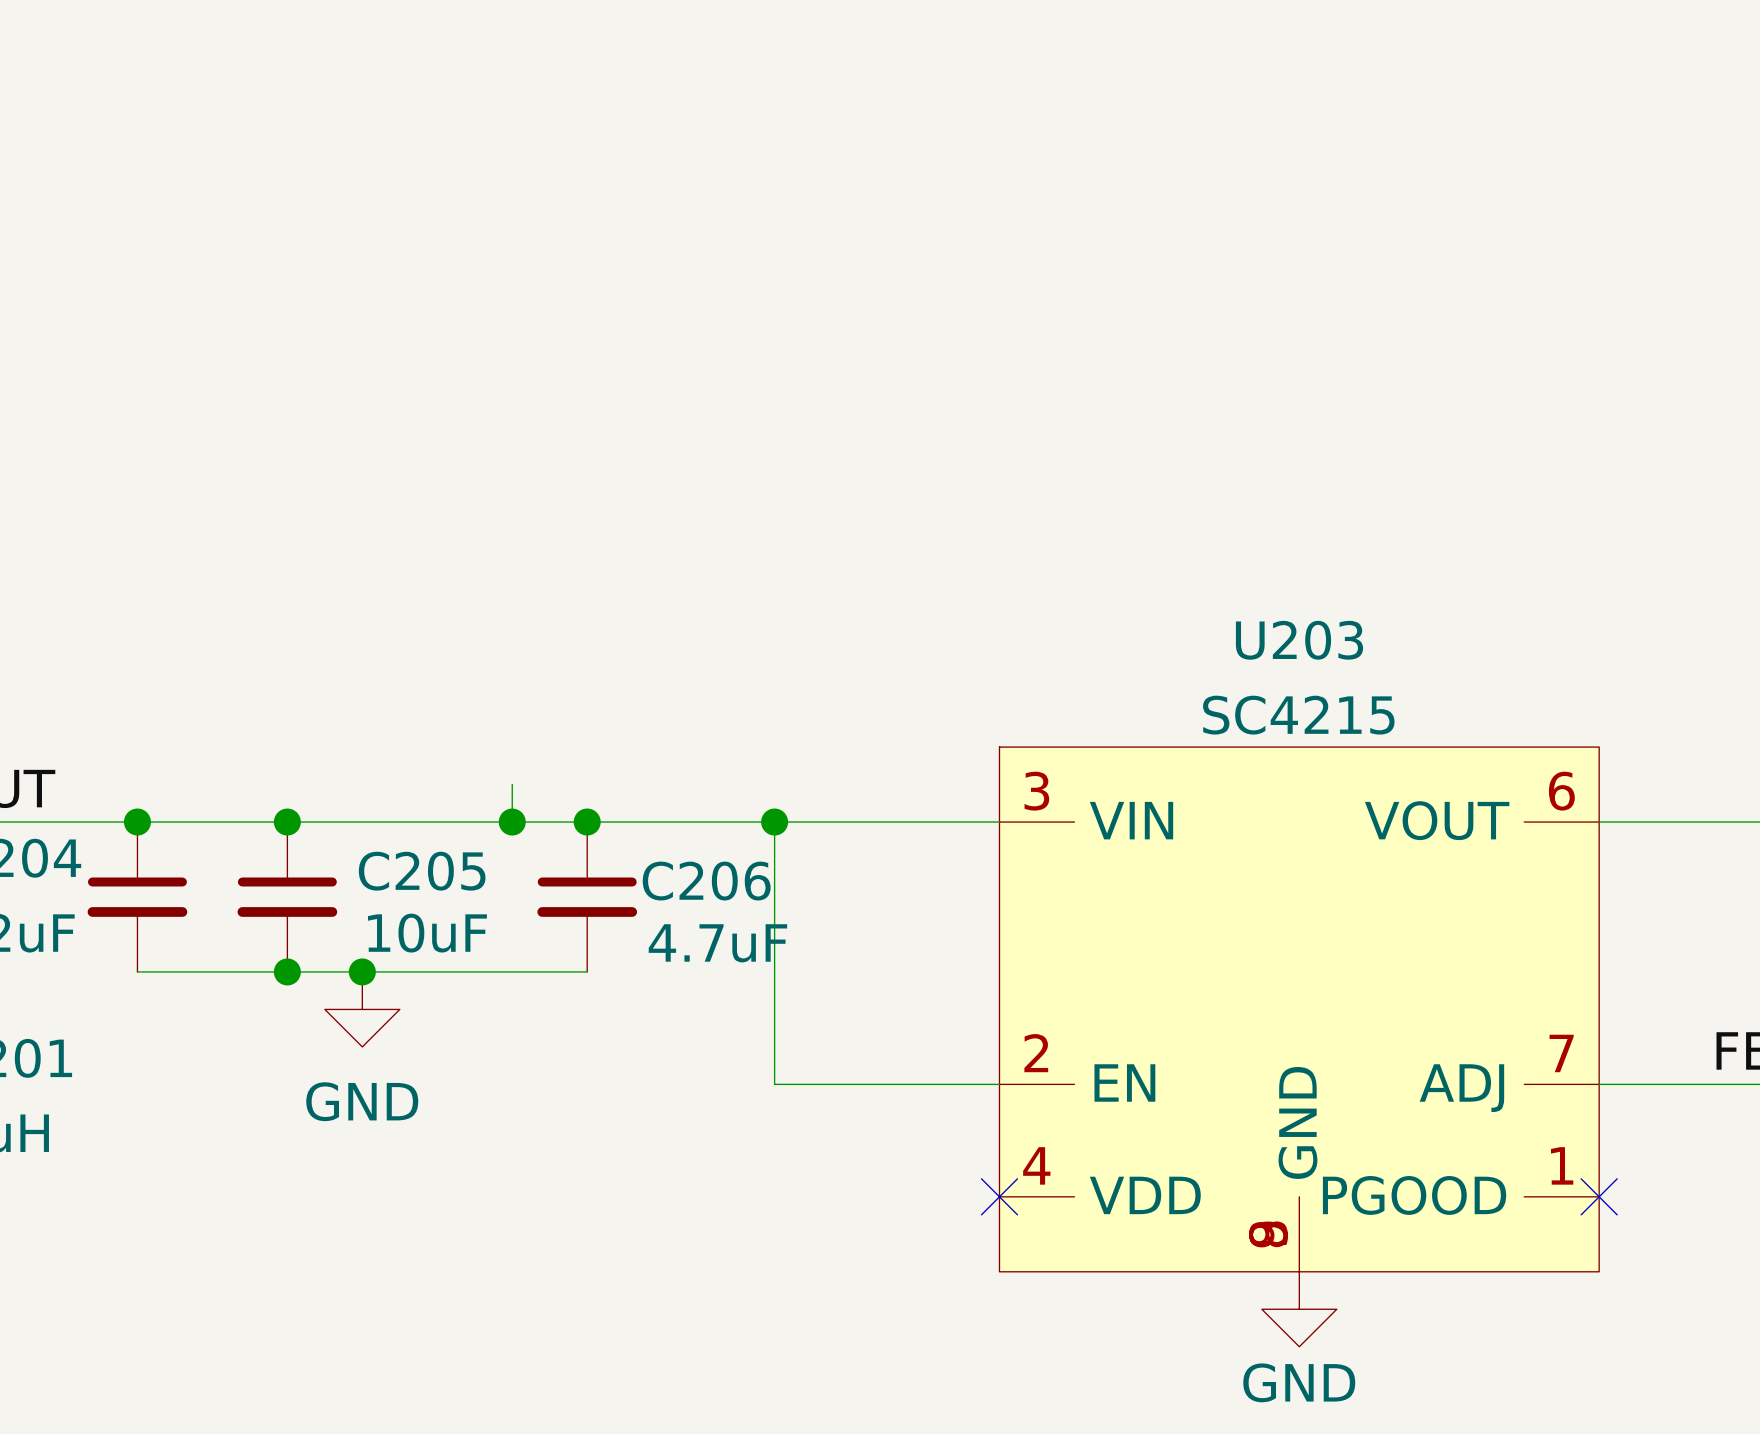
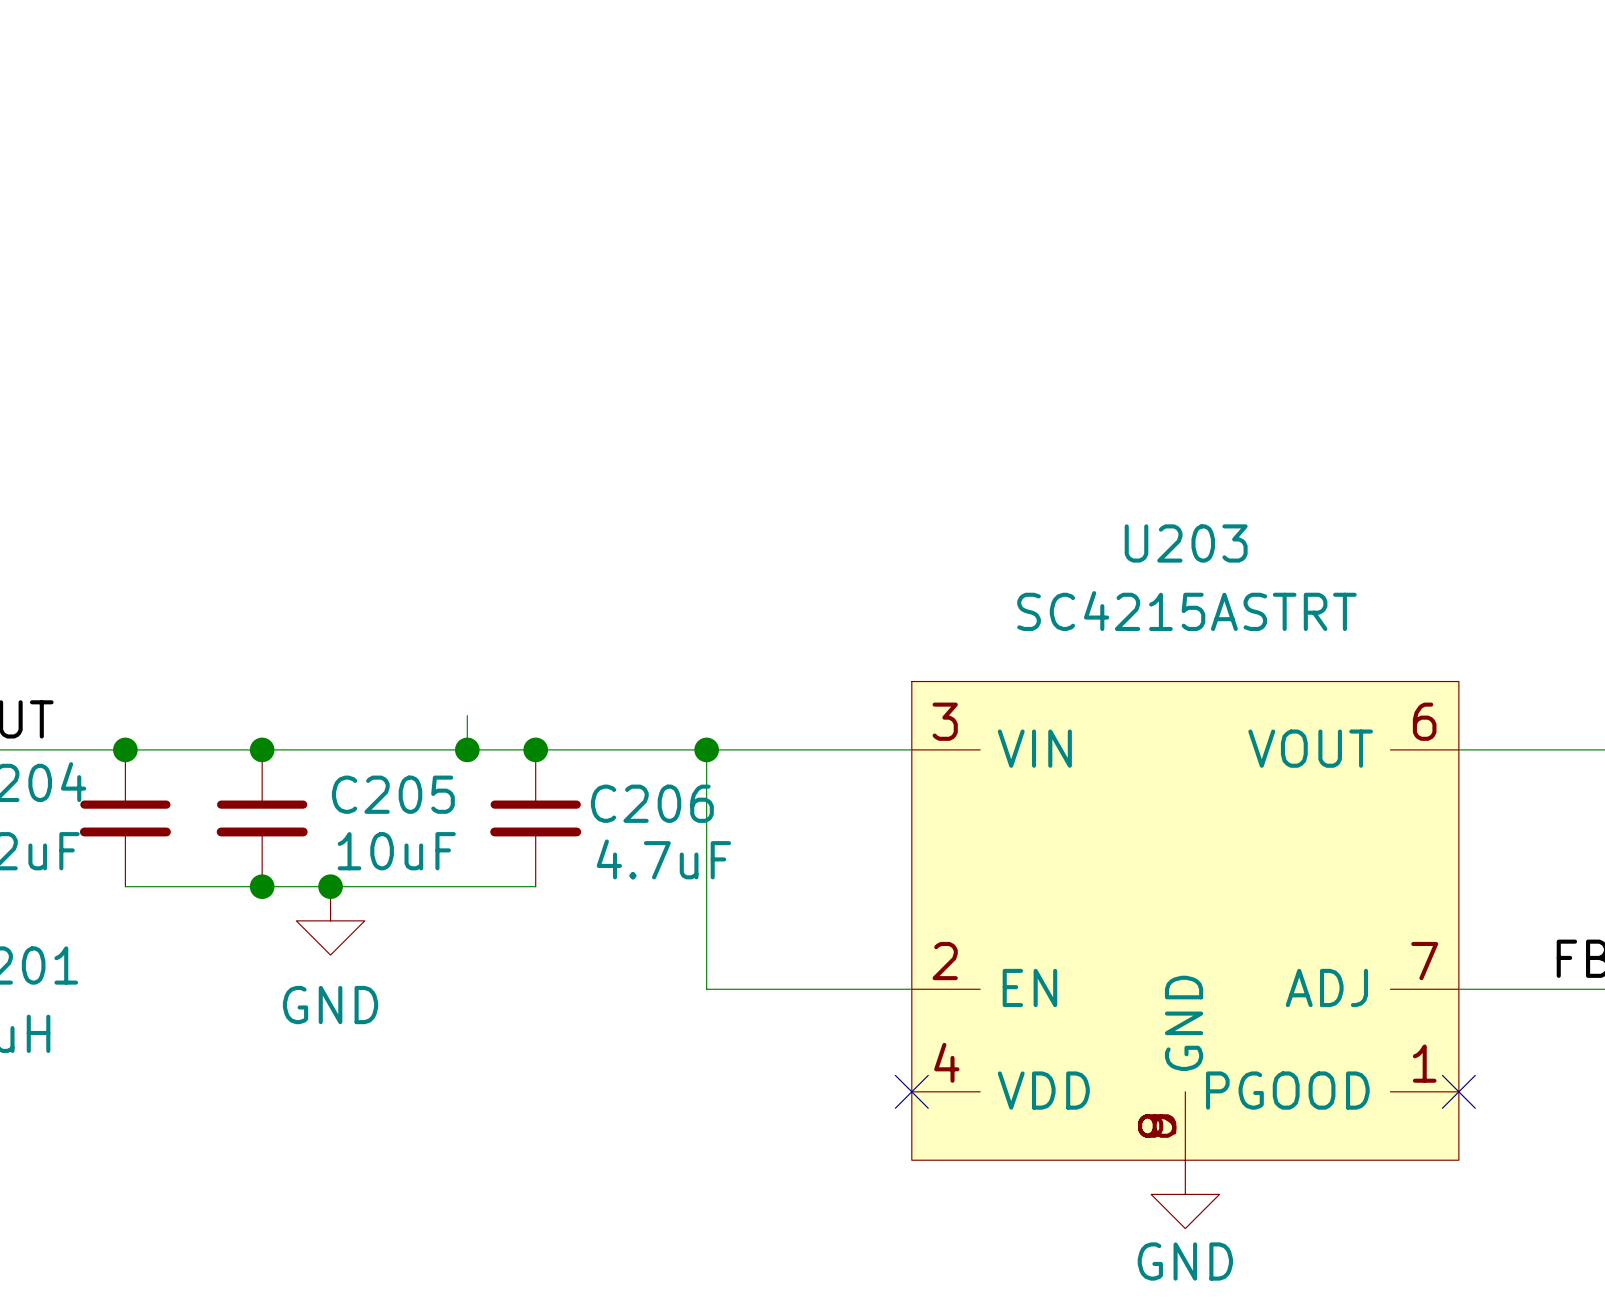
U203 name position: U203 (1299, 640) -> U203 (1186, 543)
U203 value: SC4215 (1298, 715) -> SC4215ASTRT (1186, 611)

